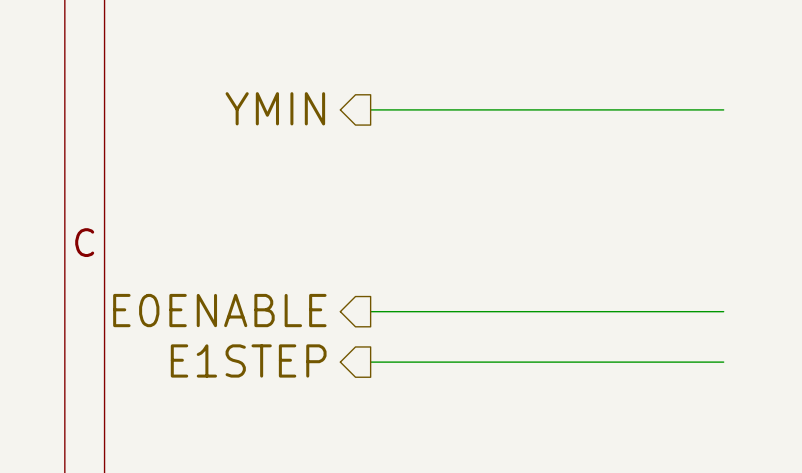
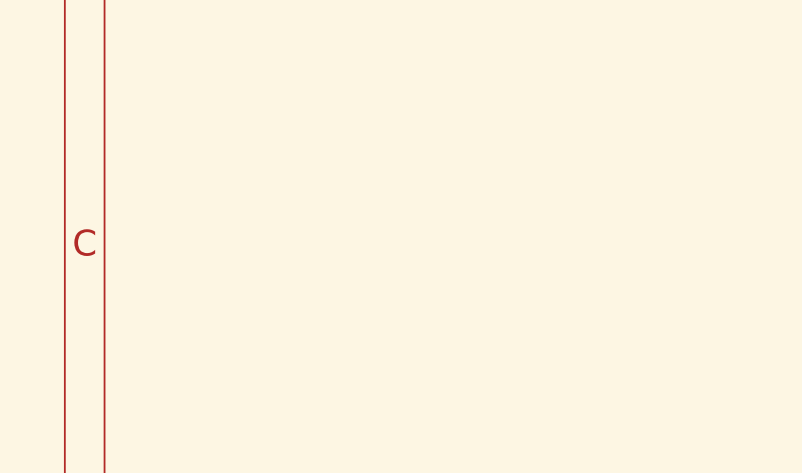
hierarchical label: YMIN (275, 108) -> none
wire: (370, 109) (723, 109) -> none
hierarchical label: E0ENABLE (219, 310) -> none
wire: (370, 311) (723, 311) -> none
hierarchical label: E1STEP (248, 360) -> none
wire: (370, 362) (723, 362) -> none

